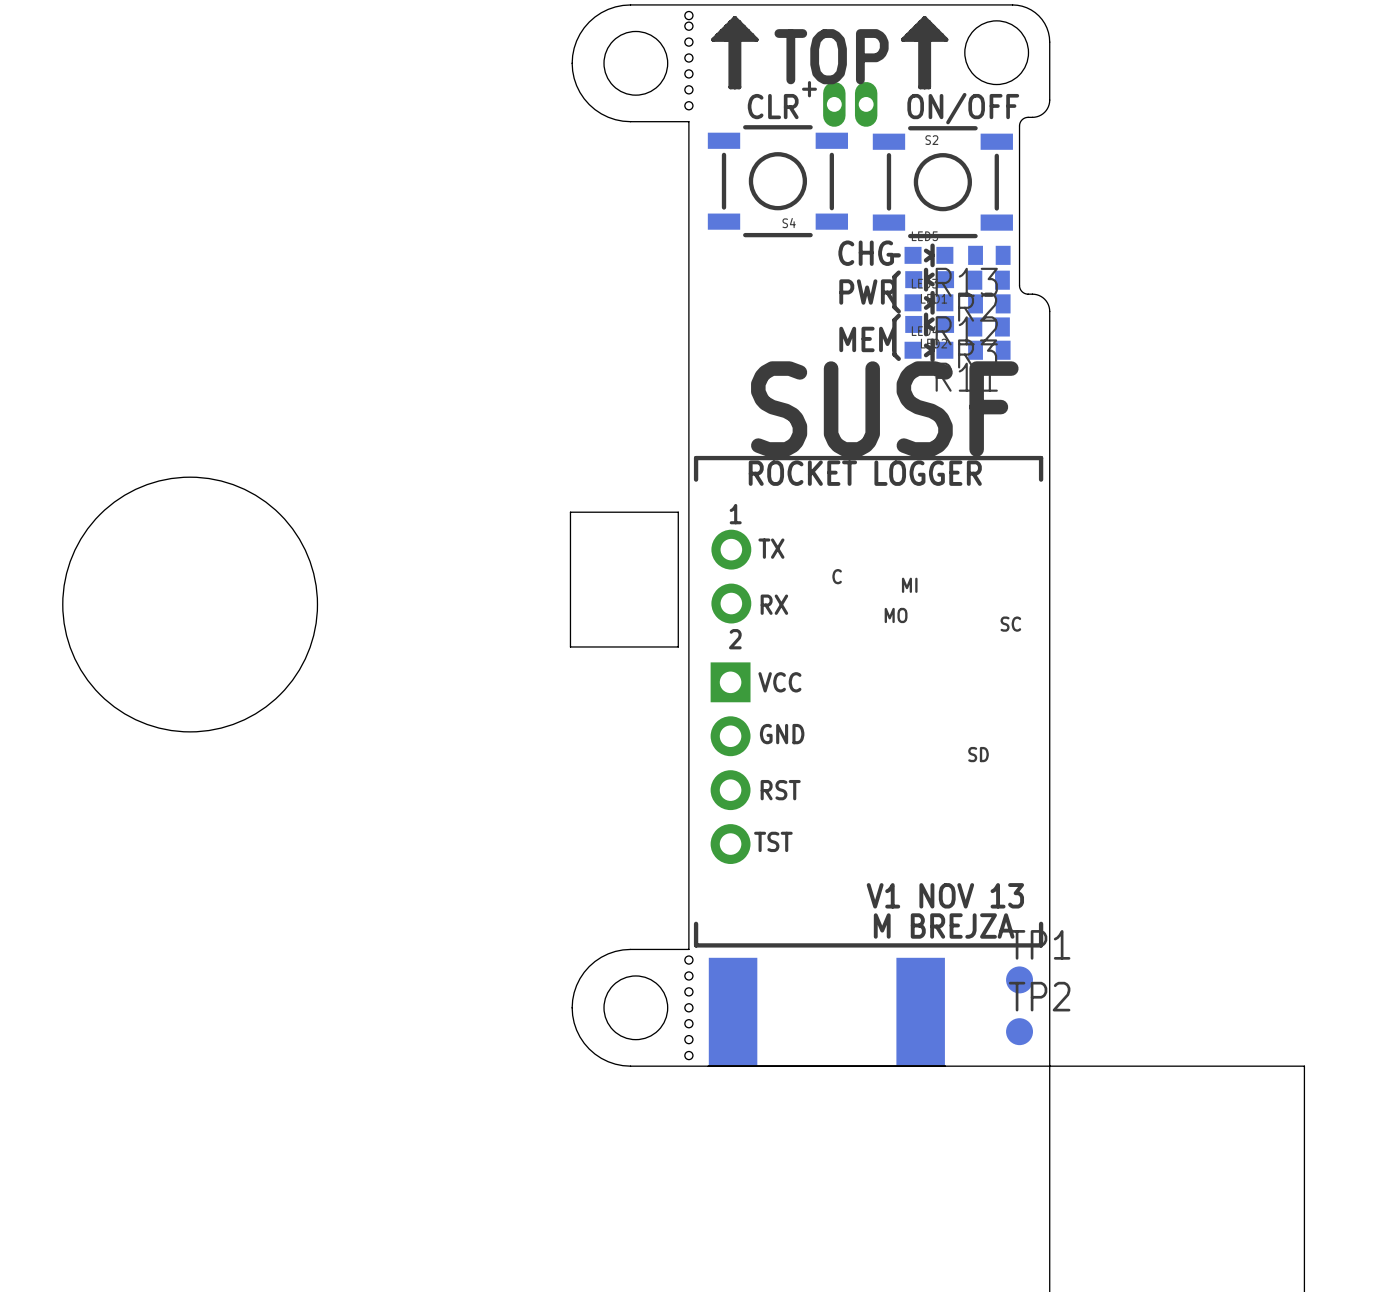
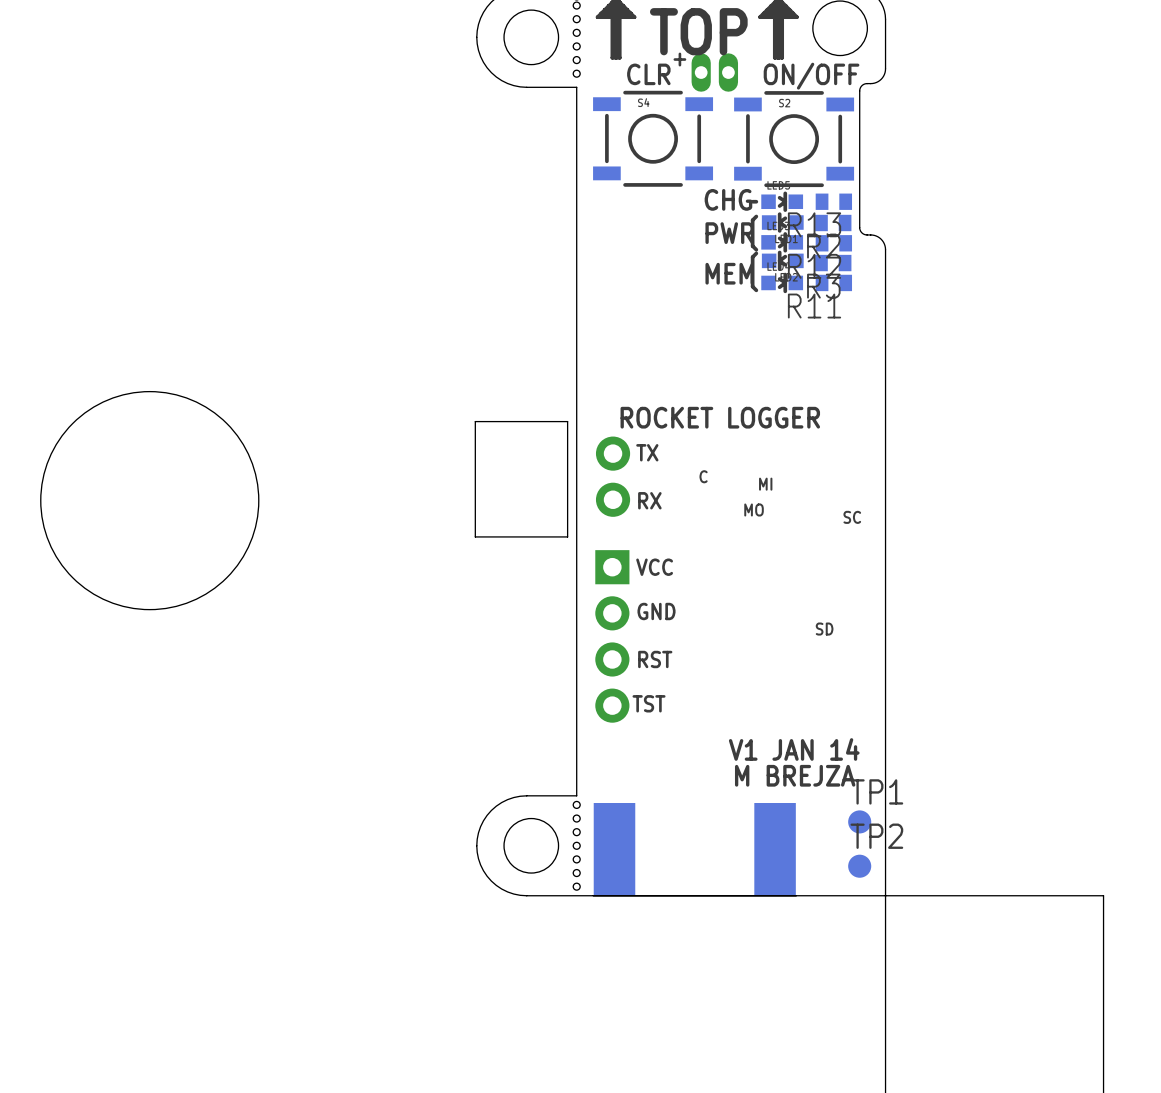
S4 rotation: 0° (777, 181) -> 180° (653, 138)
text: SUSF (884, 409) -> none
text: ROCKET LOGGER (865, 473) -> none
line: (1041, 479) (1041, 458) (696, 458) (696, 479) -> none
text: 1 (735, 514) -> ROCKET LOGGER (720, 417)
text: 2 (735, 639) -> none
text: V1 NOV 13 (945, 895) -> V1 JAN 14 (794, 749)
line: (1041, 923) (1041, 945) (696, 945) (696, 923) -> none

